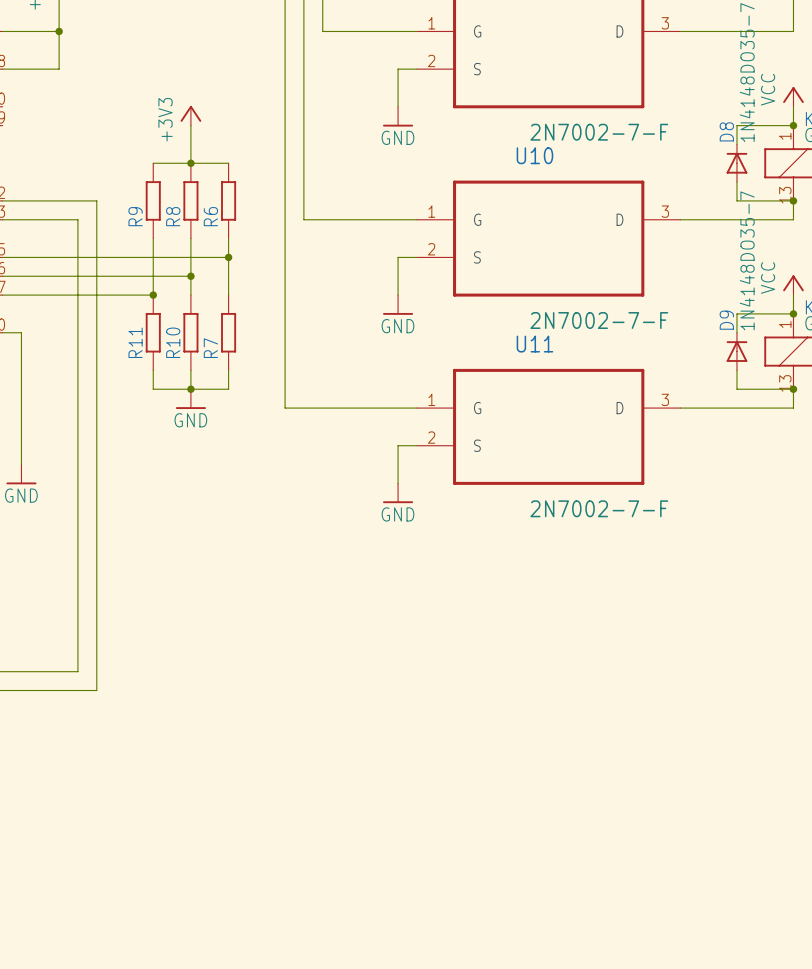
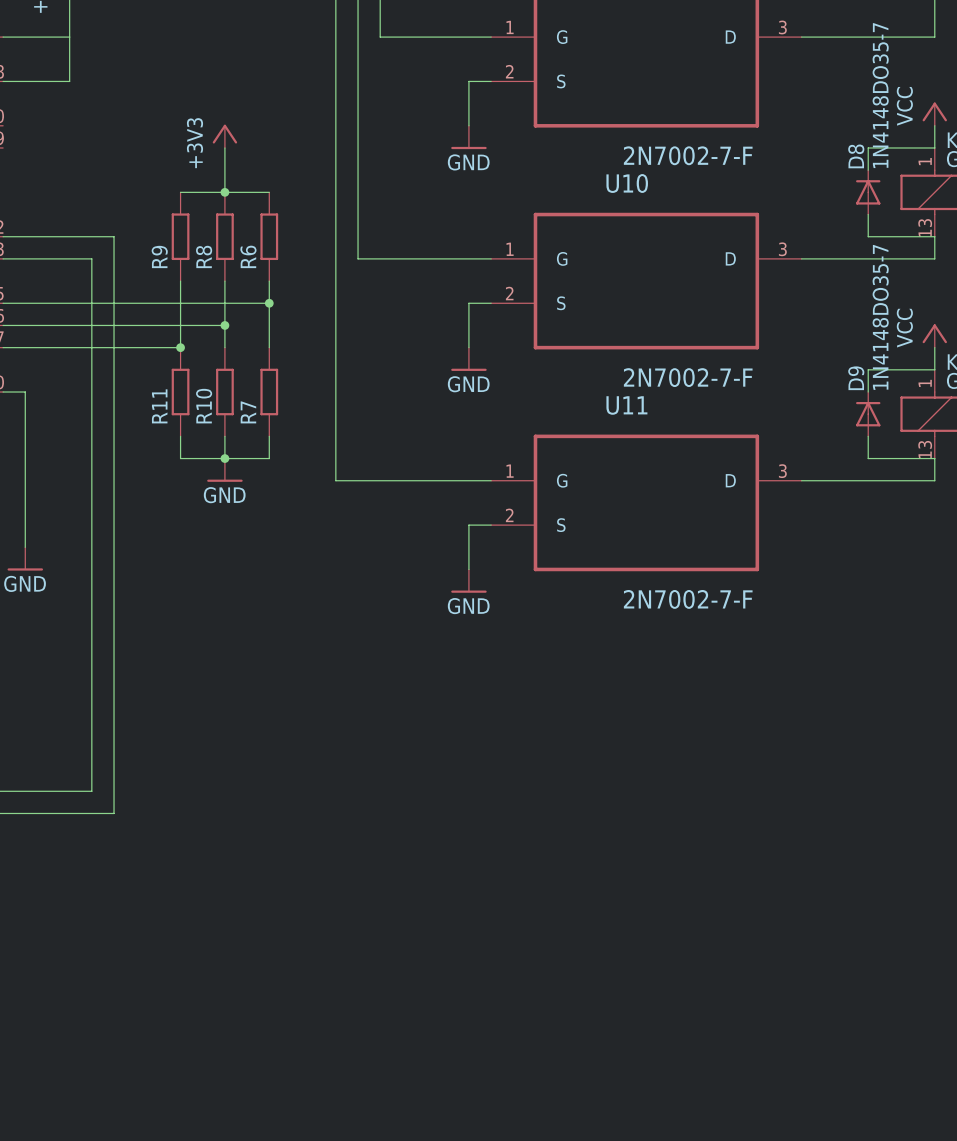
junction: (59, 31) -> none
junction: (793, 125) -> none
junction: (793, 200) -> none
junction: (793, 313) -> none
junction: (793, 389) -> none

